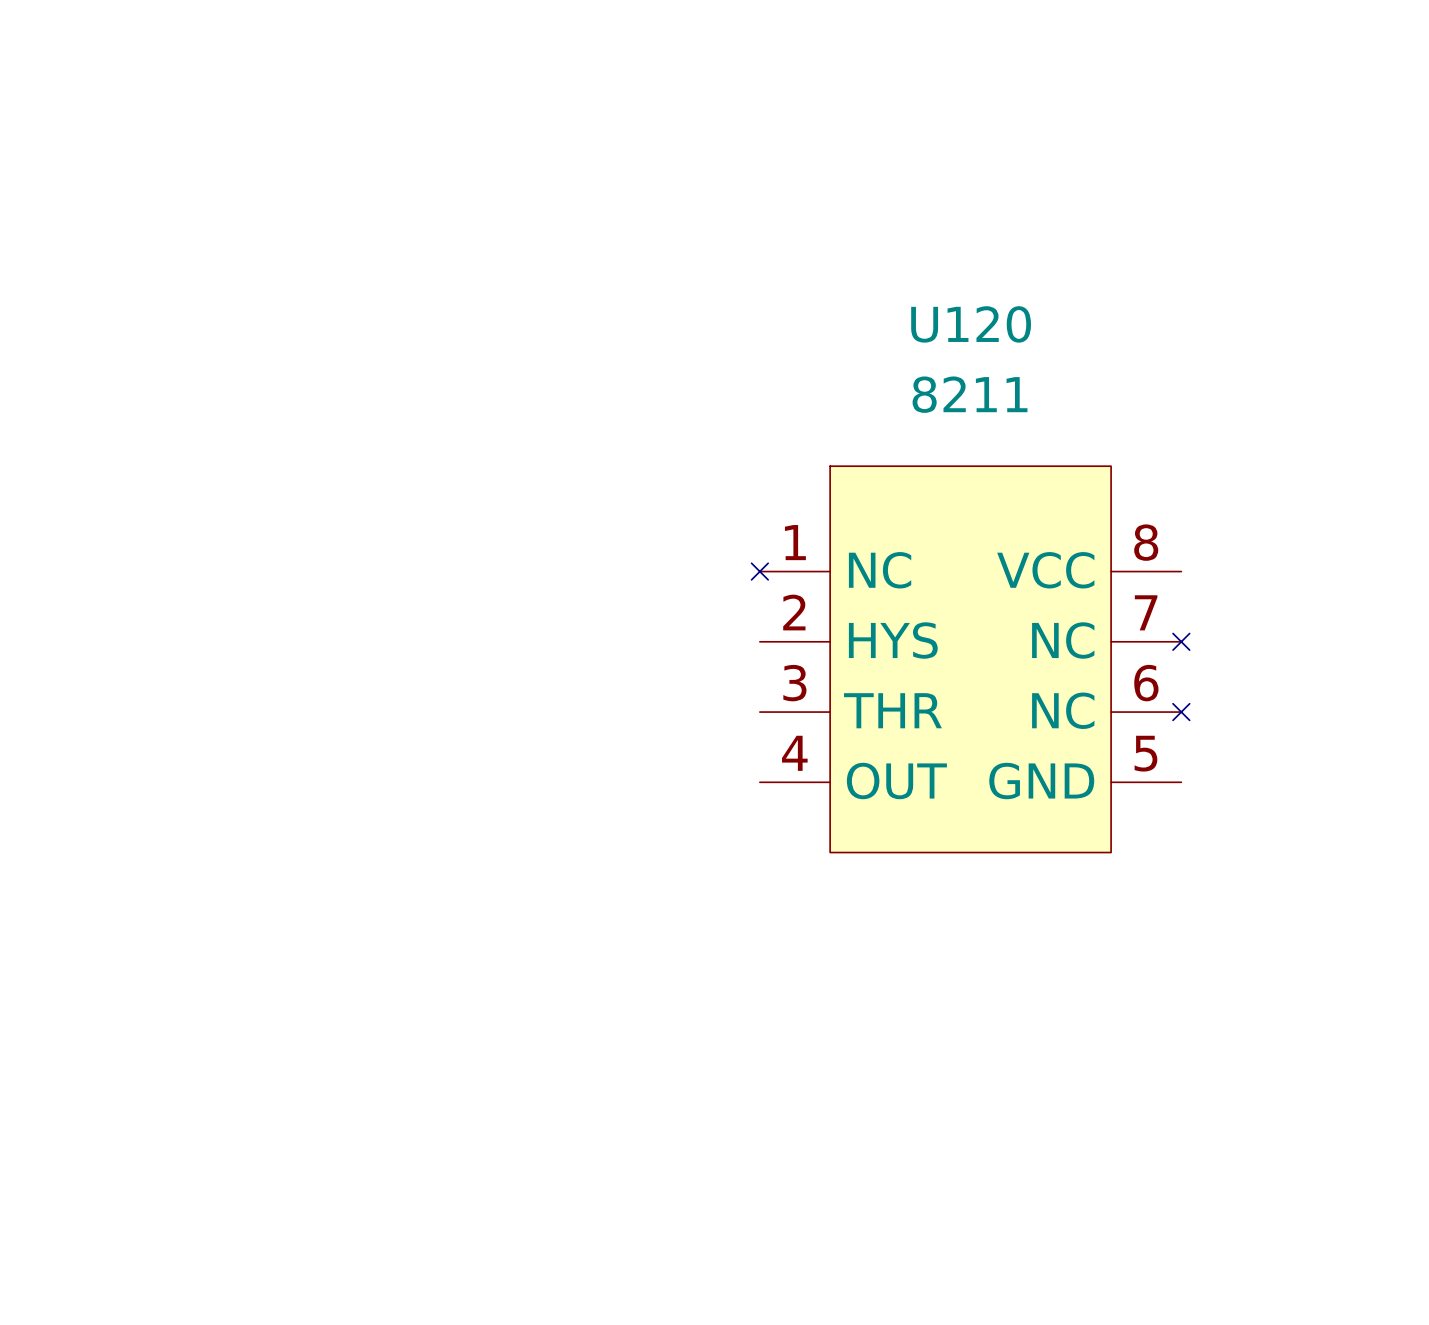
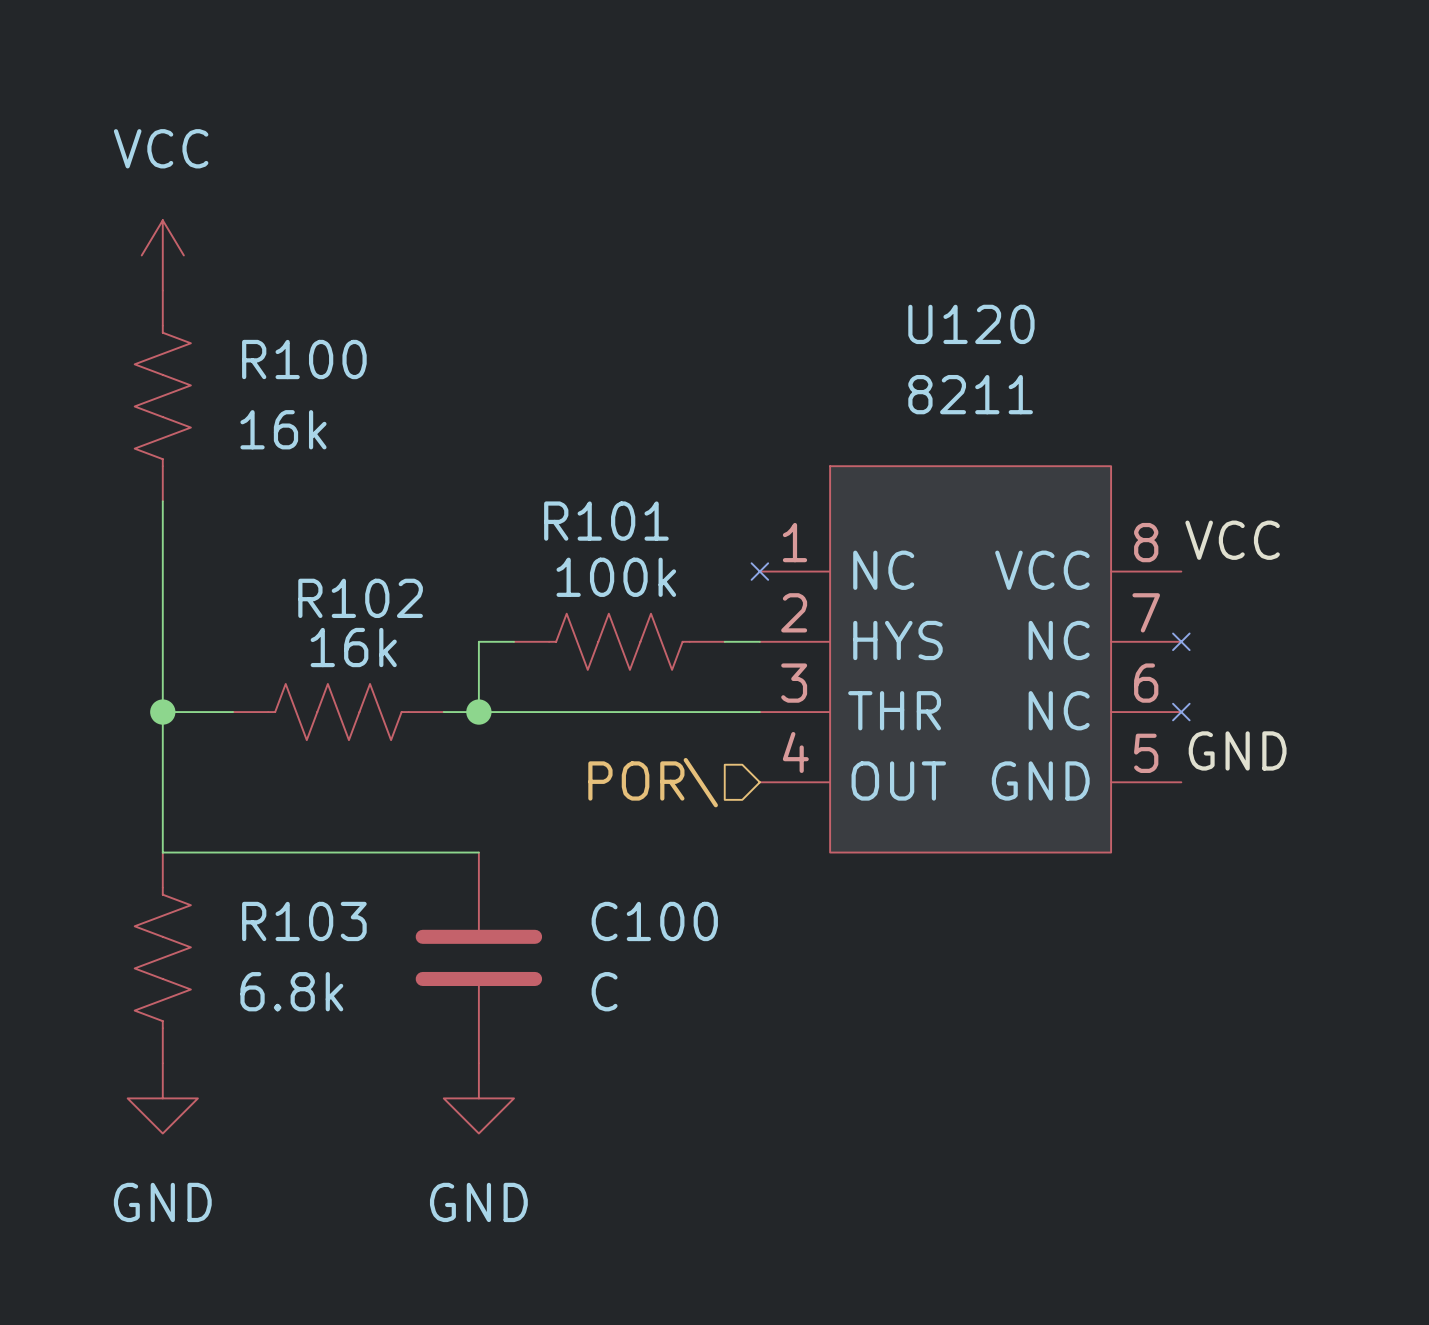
power symbol: none -> VCC (162, 255)
R100: none -> 16k (162, 395)
wire: none -> (162, 501) (162, 852) (478, 852)
label: none -> VCC (1232, 540)
wire: none -> (514, 641) (478, 641) (478, 712)
R101: none -> 100k (619, 641)
wire: none -> (724, 641) (759, 641)
wire: none -> (162, 712) (233, 712)
junction: none -> (162, 712)
R102: none -> 16k (338, 712)
wire: none -> (443, 712) (759, 712)
junction: none -> (478, 712)
label: none -> GND (1237, 750)
hierarchical label: none -> POR\ (653, 782)
R103: none -> 6.8k (162, 957)
C100: none -> C (478, 957)
power symbol: none -> GND (162, 1098)
power symbol: none -> GND (478, 1098)

